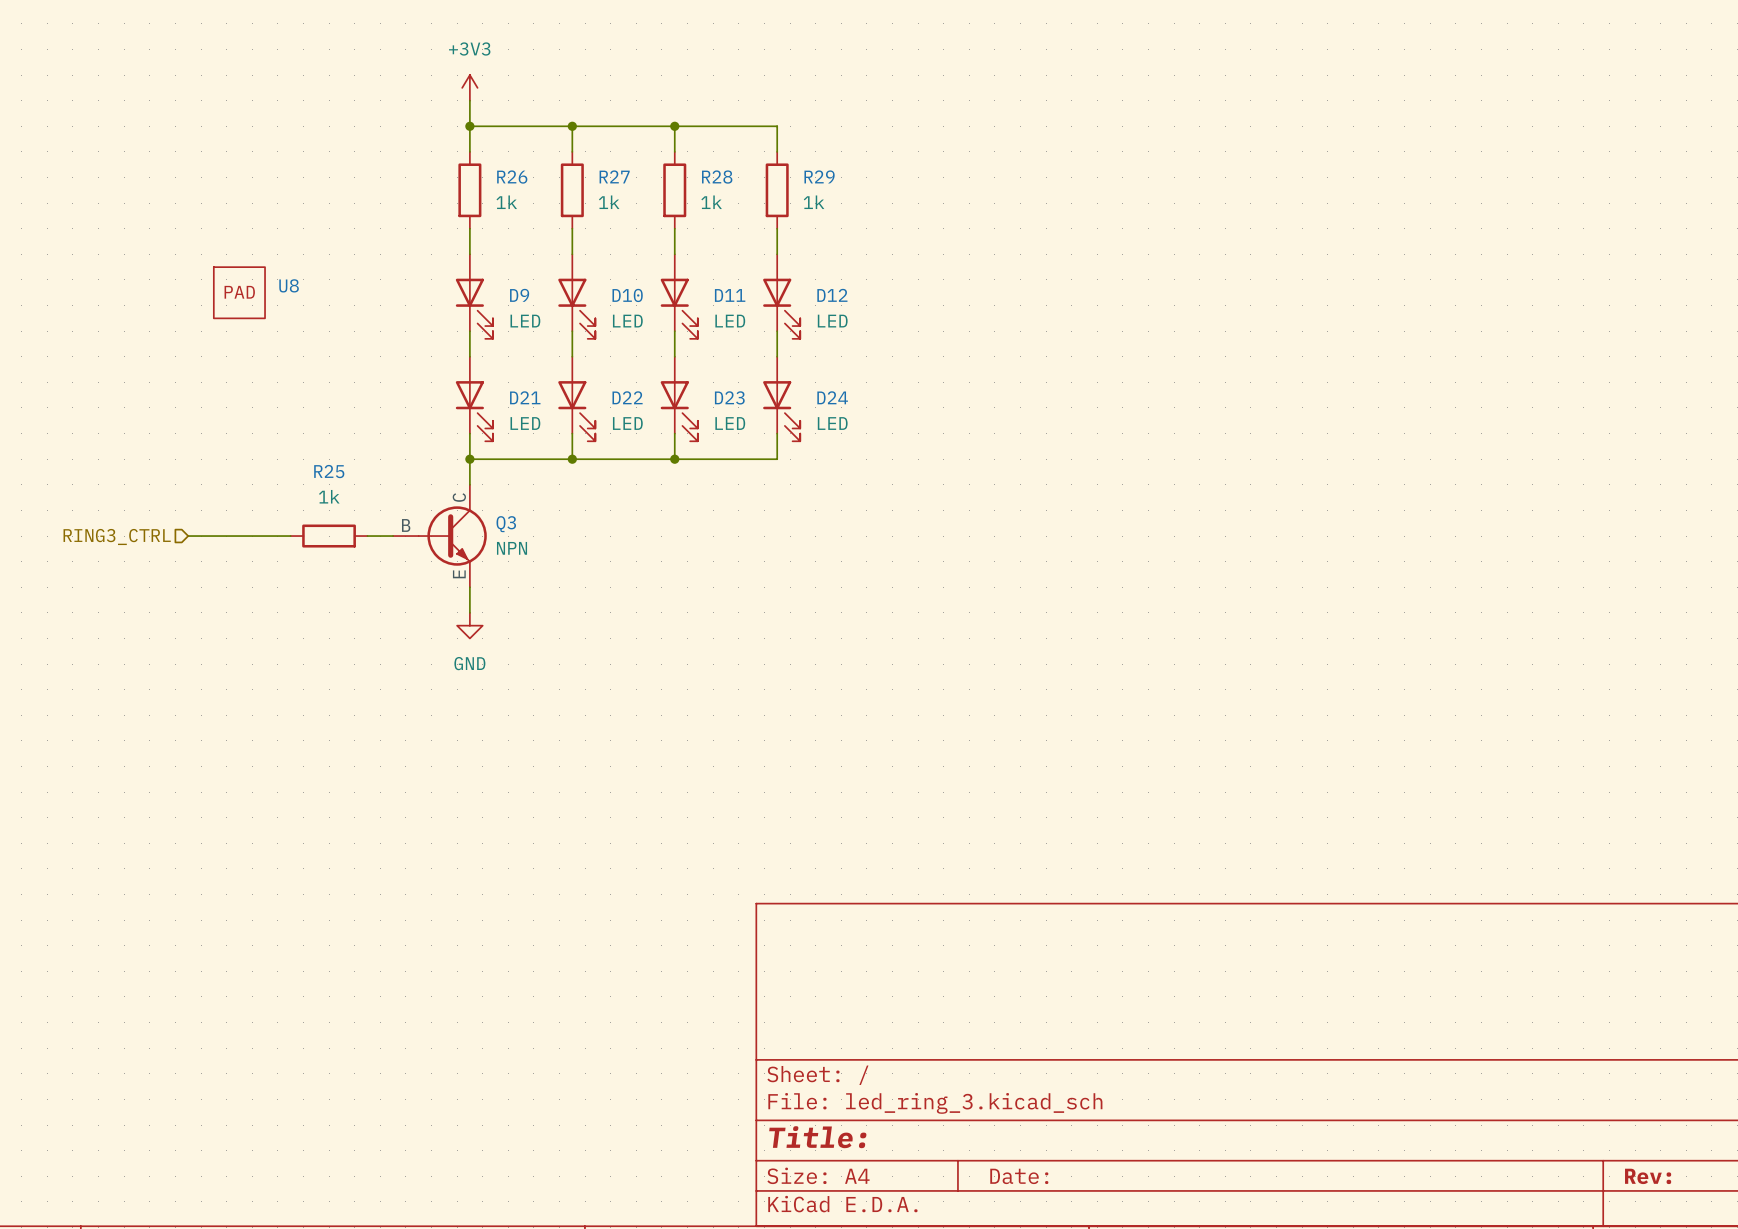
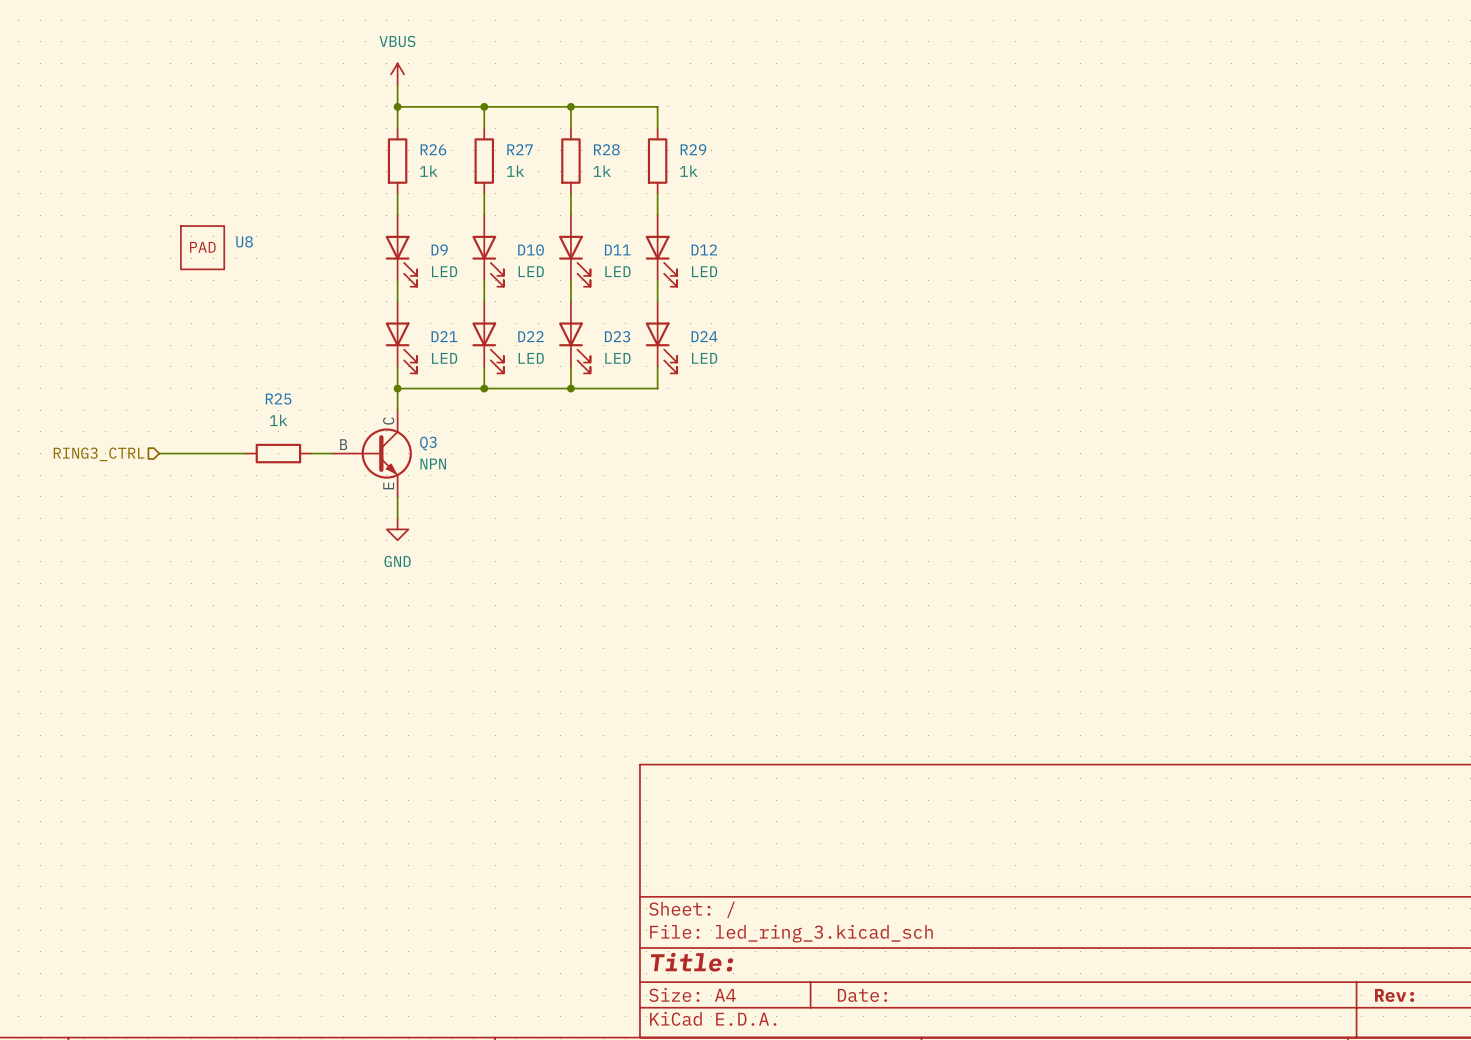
power symbol: +3V3 (469, 87) -> VBUS (397, 74)

